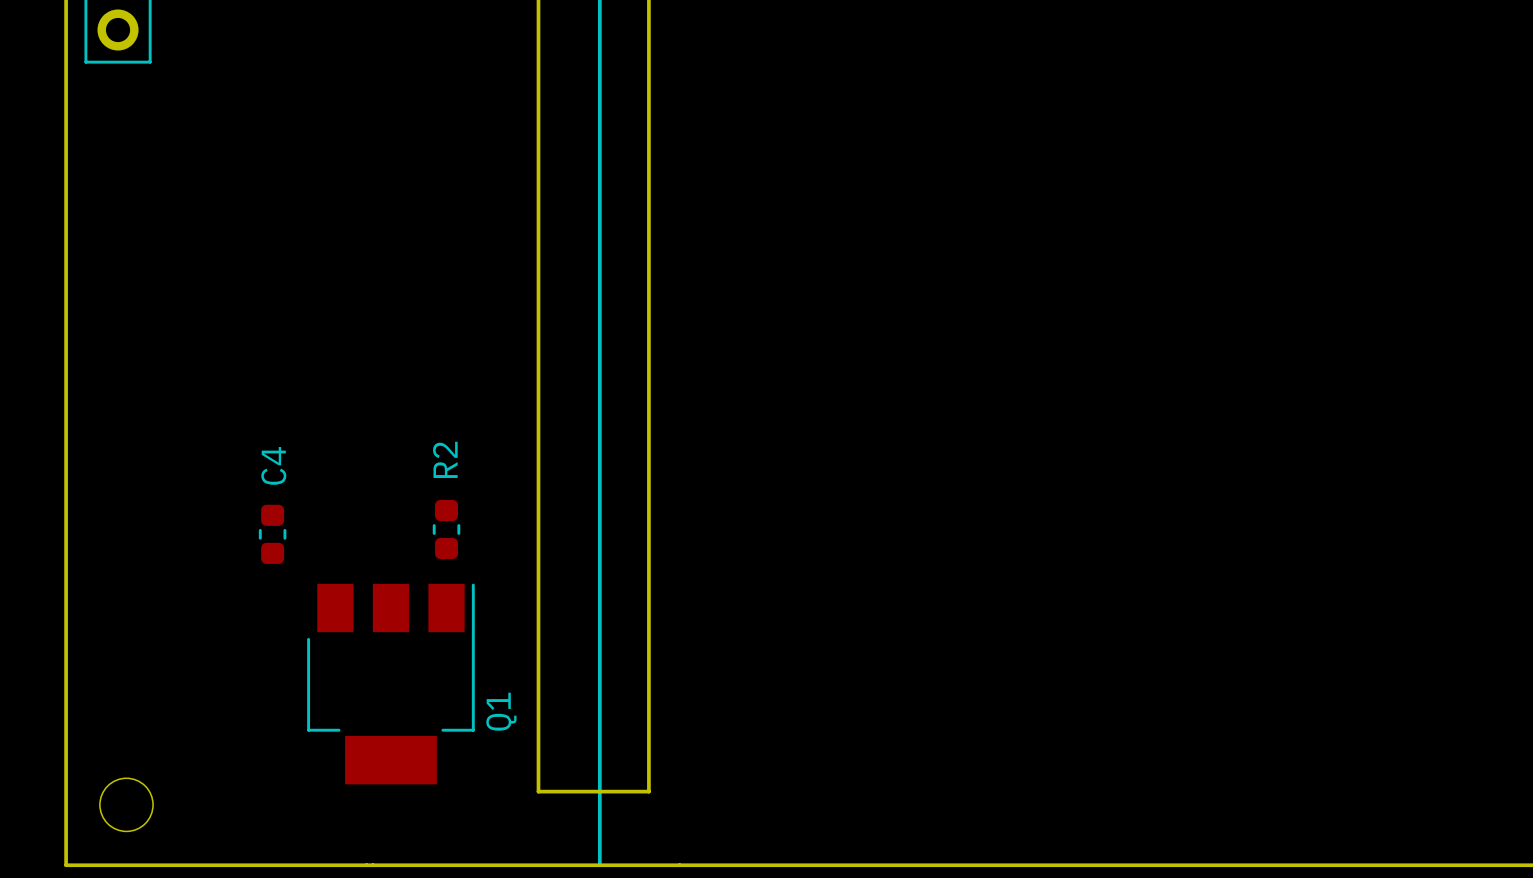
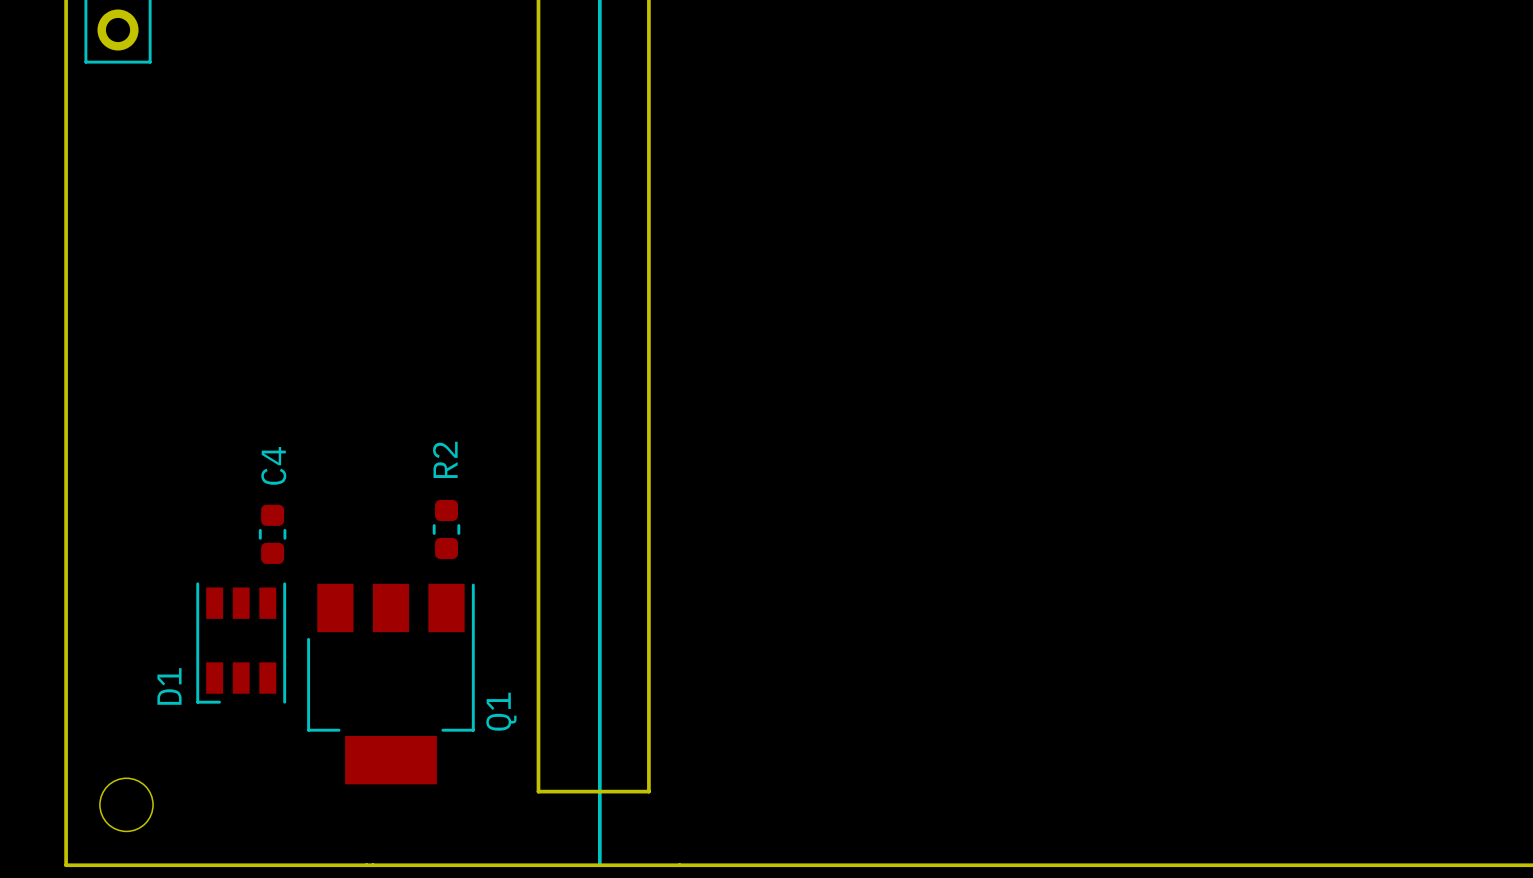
D1: none -> (241, 643)

